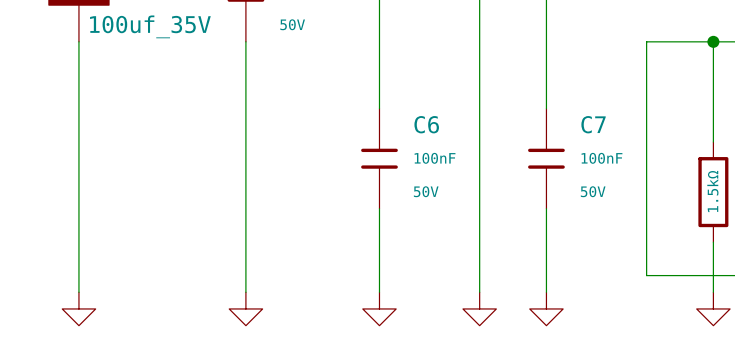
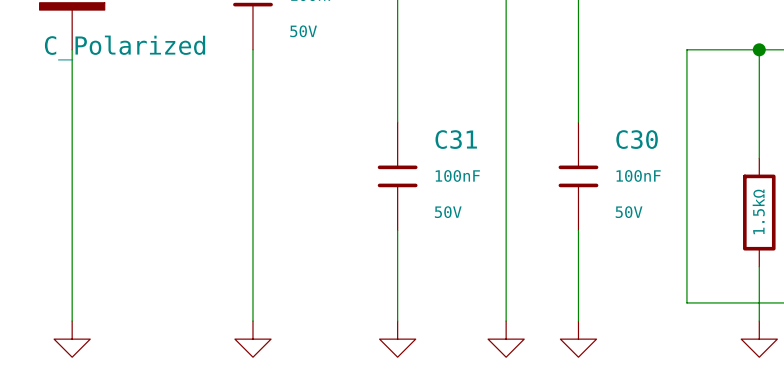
part value: 100uf_35V (150, 26) -> C_Polarized (125, 48)
C6 name: C6 (426, 124) -> C31 (456, 139)
C7 name: C7 (593, 124) -> C30 (637, 139)

